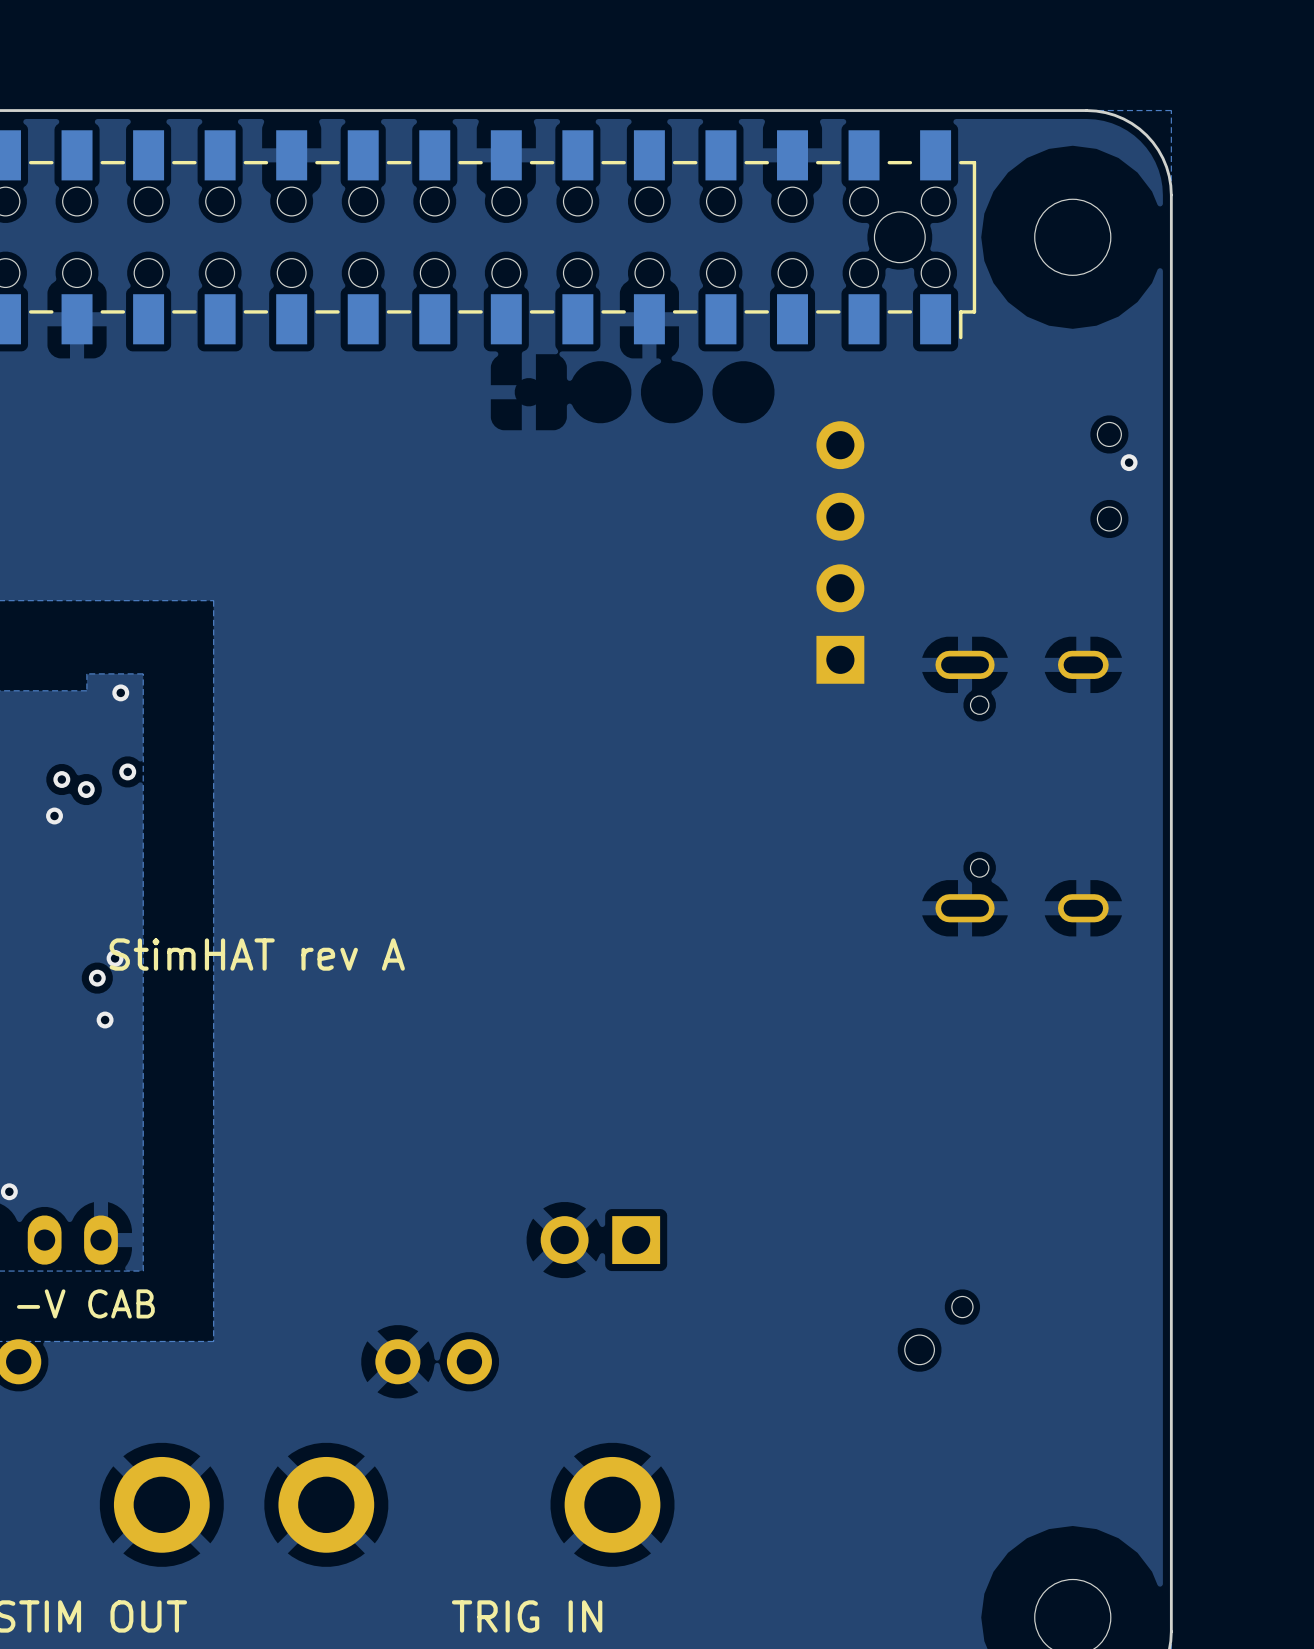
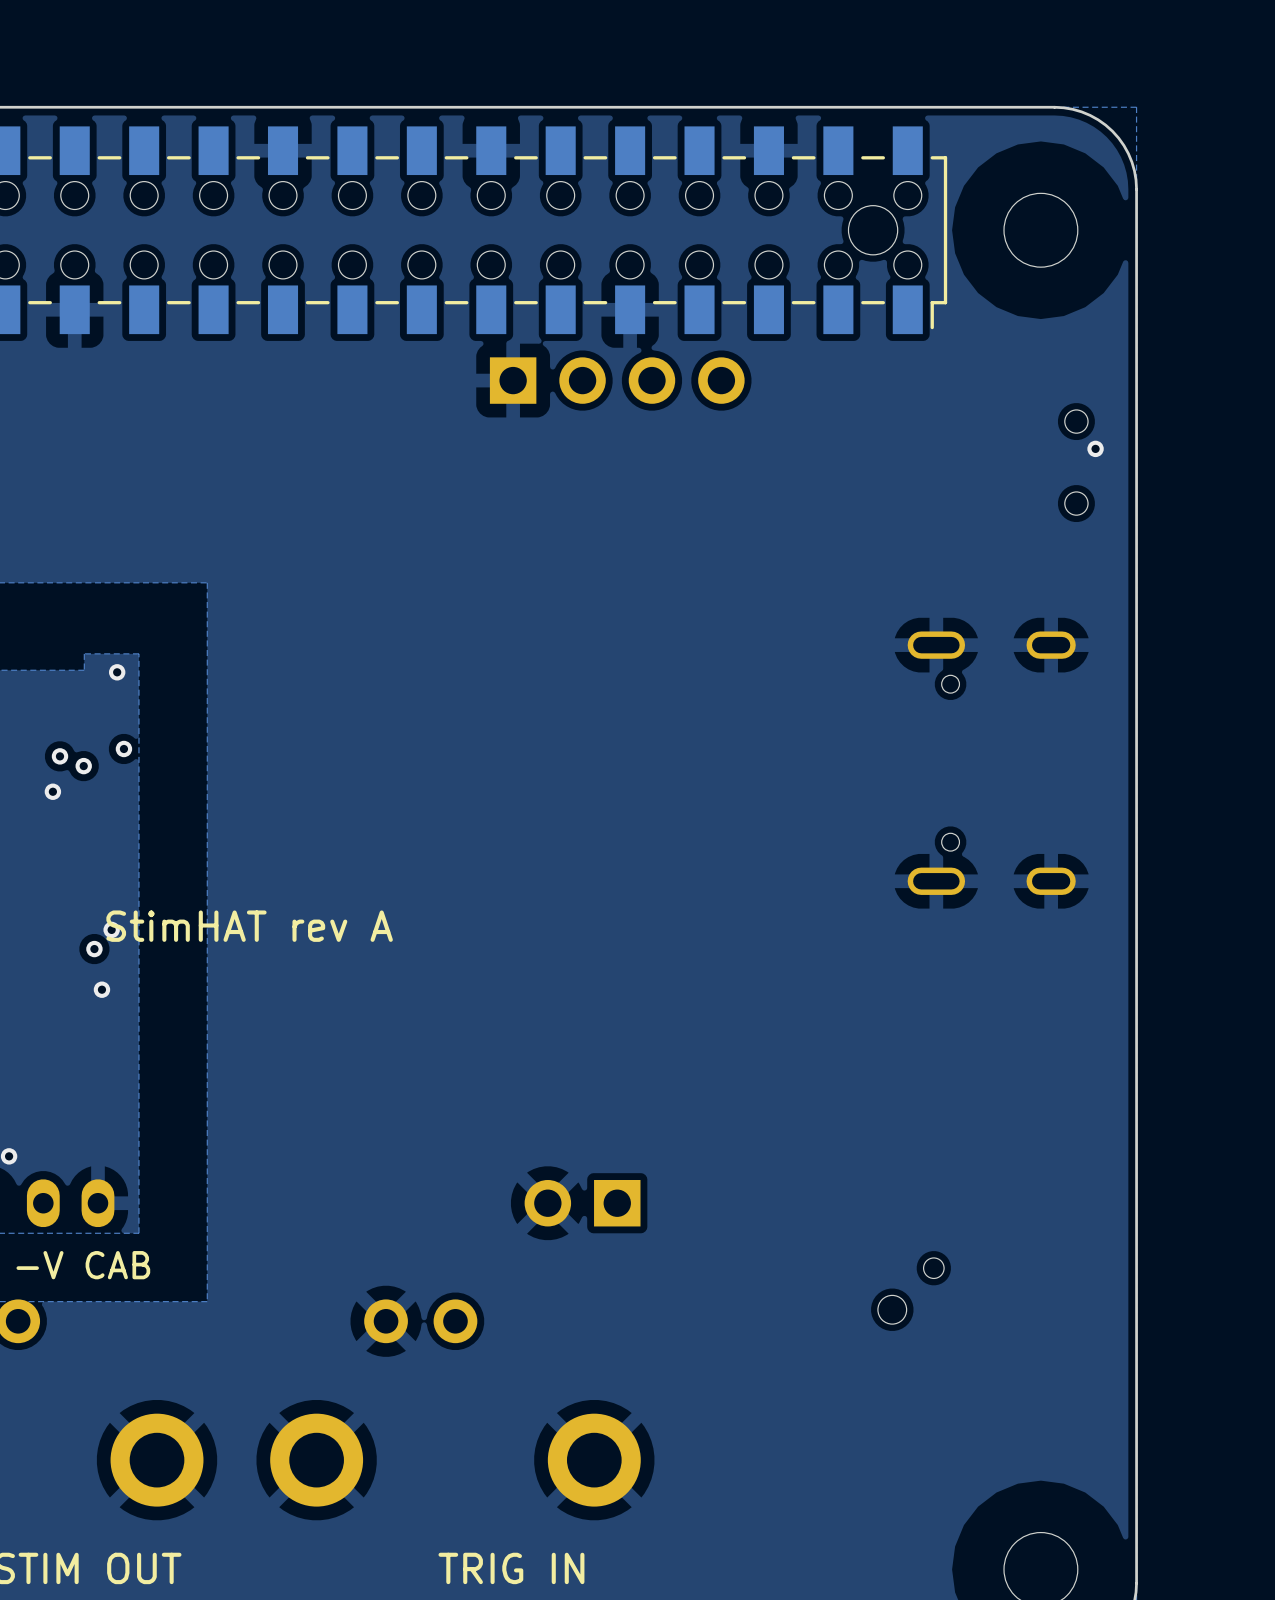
part rotation: 0° (840, 552) -> 90° clockwise (617, 380)
part position: (840, 552) -> (617, 380)

